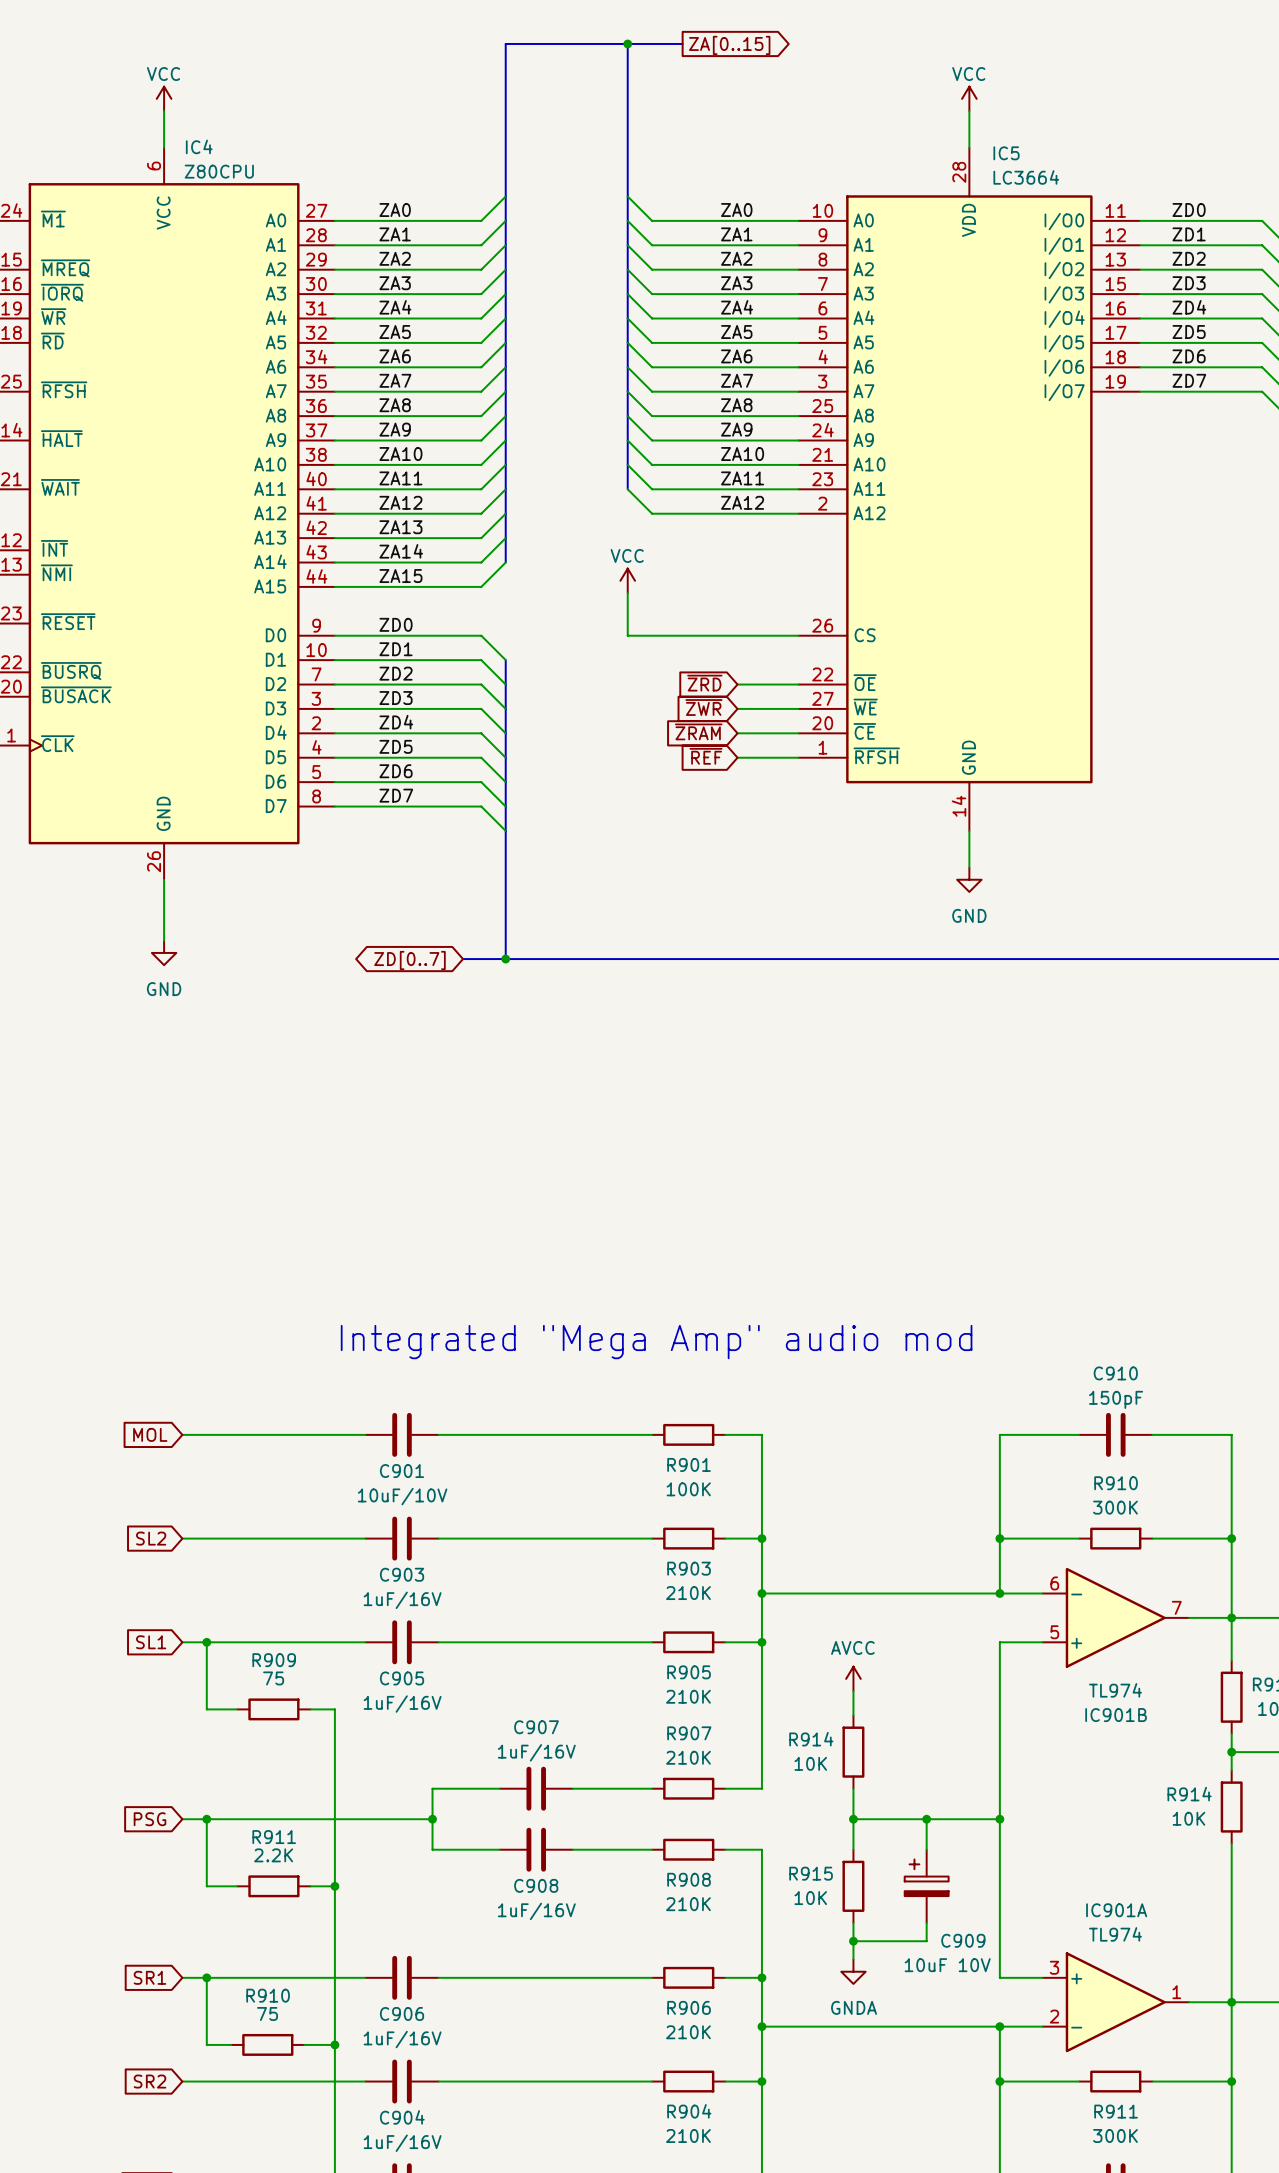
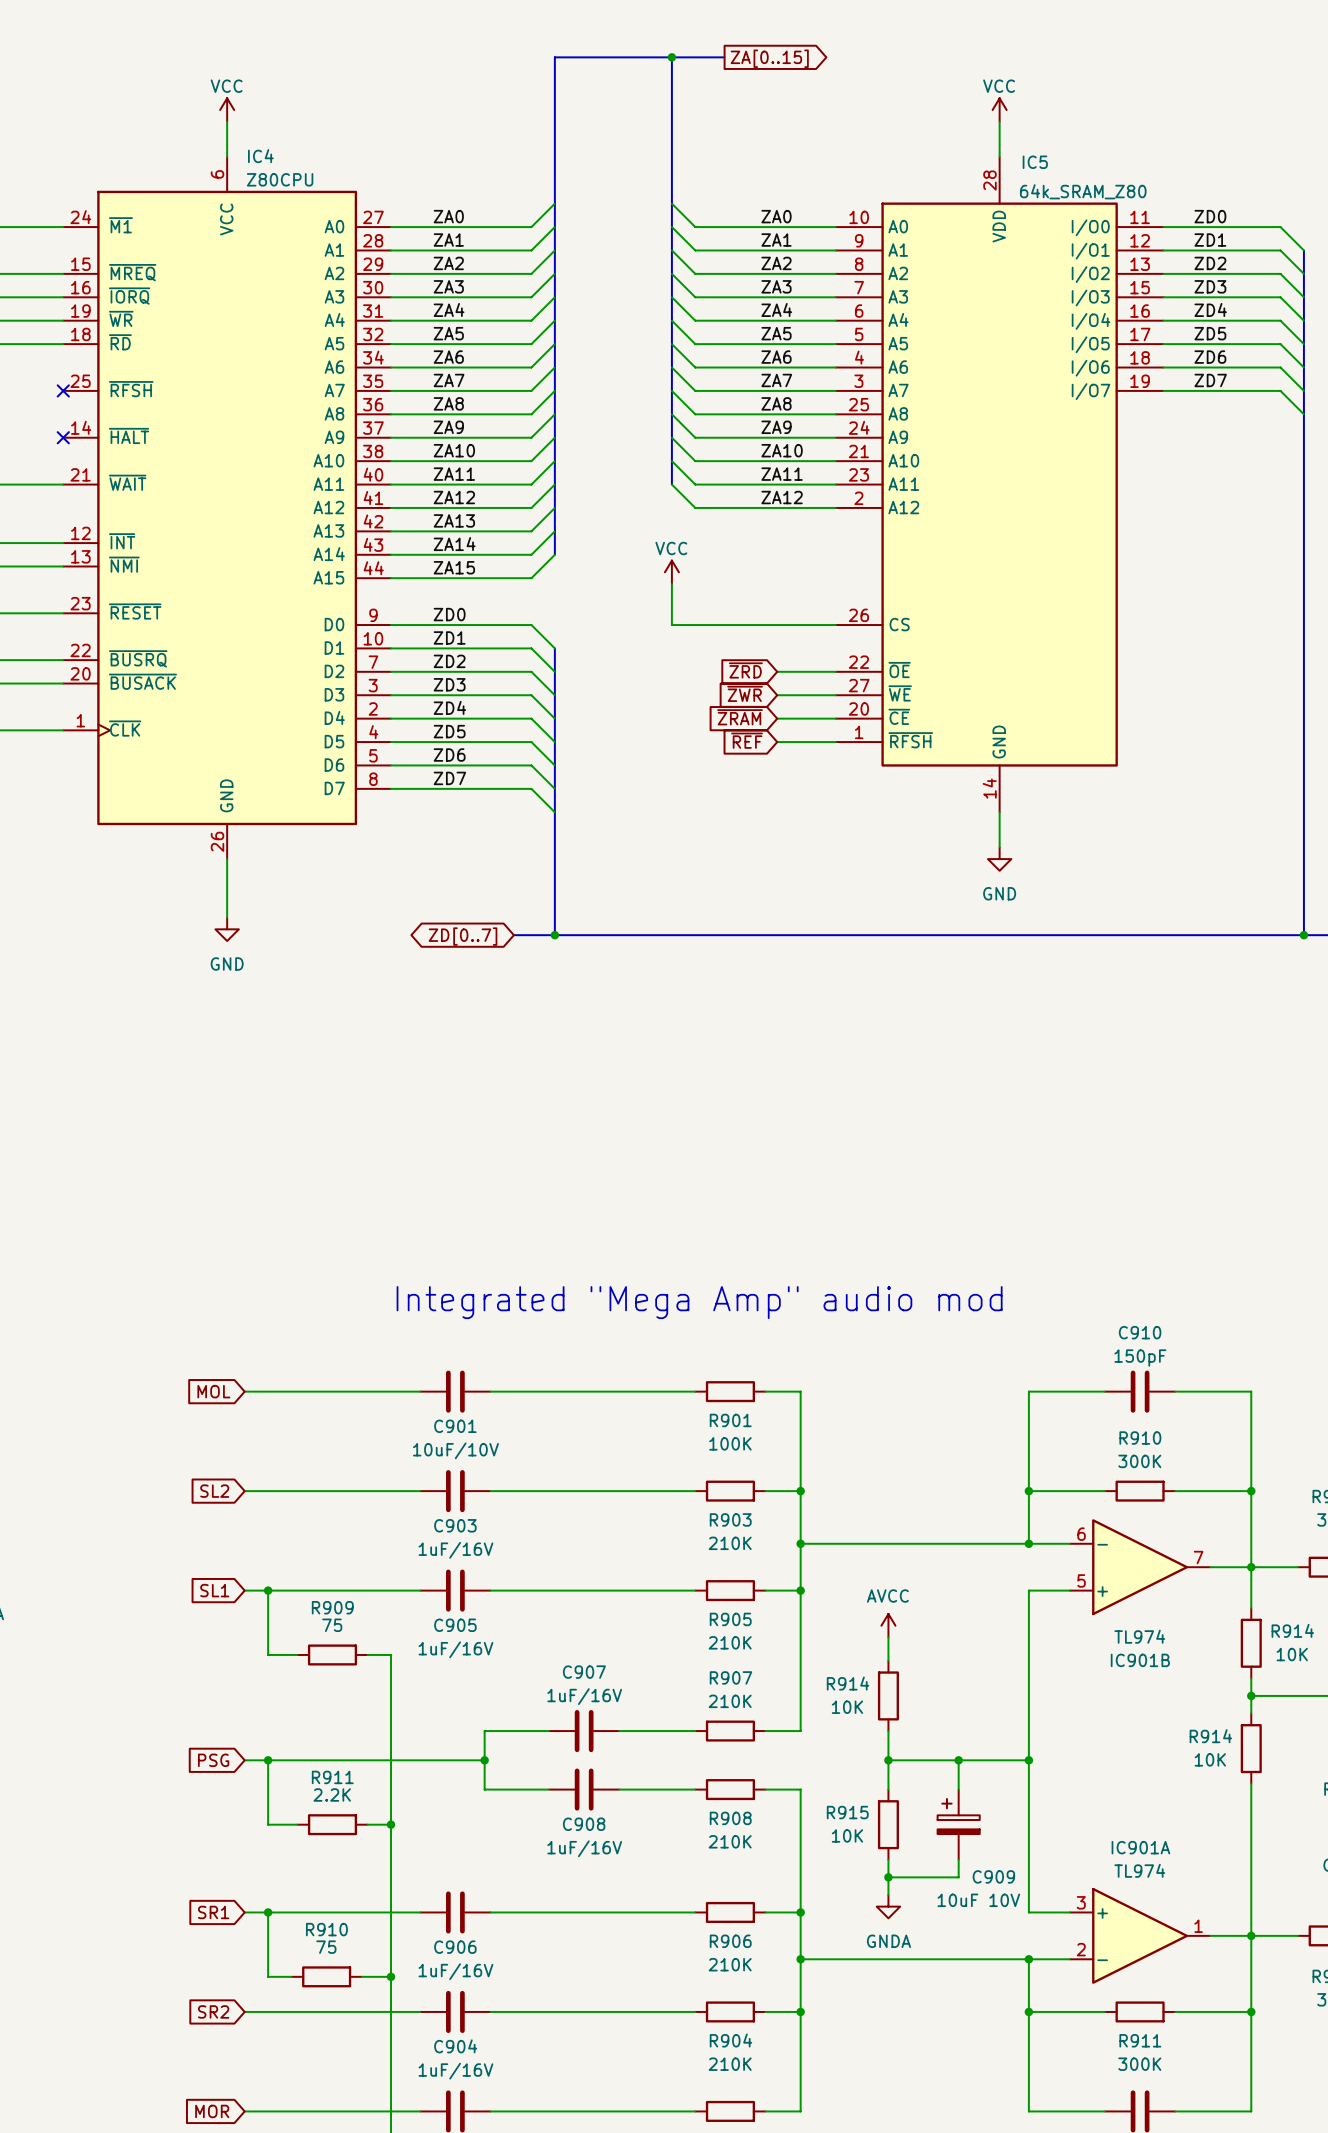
IC5 value: LC3664 (1026, 177) -> 64k_SRAM_Z80 (1083, 191)

